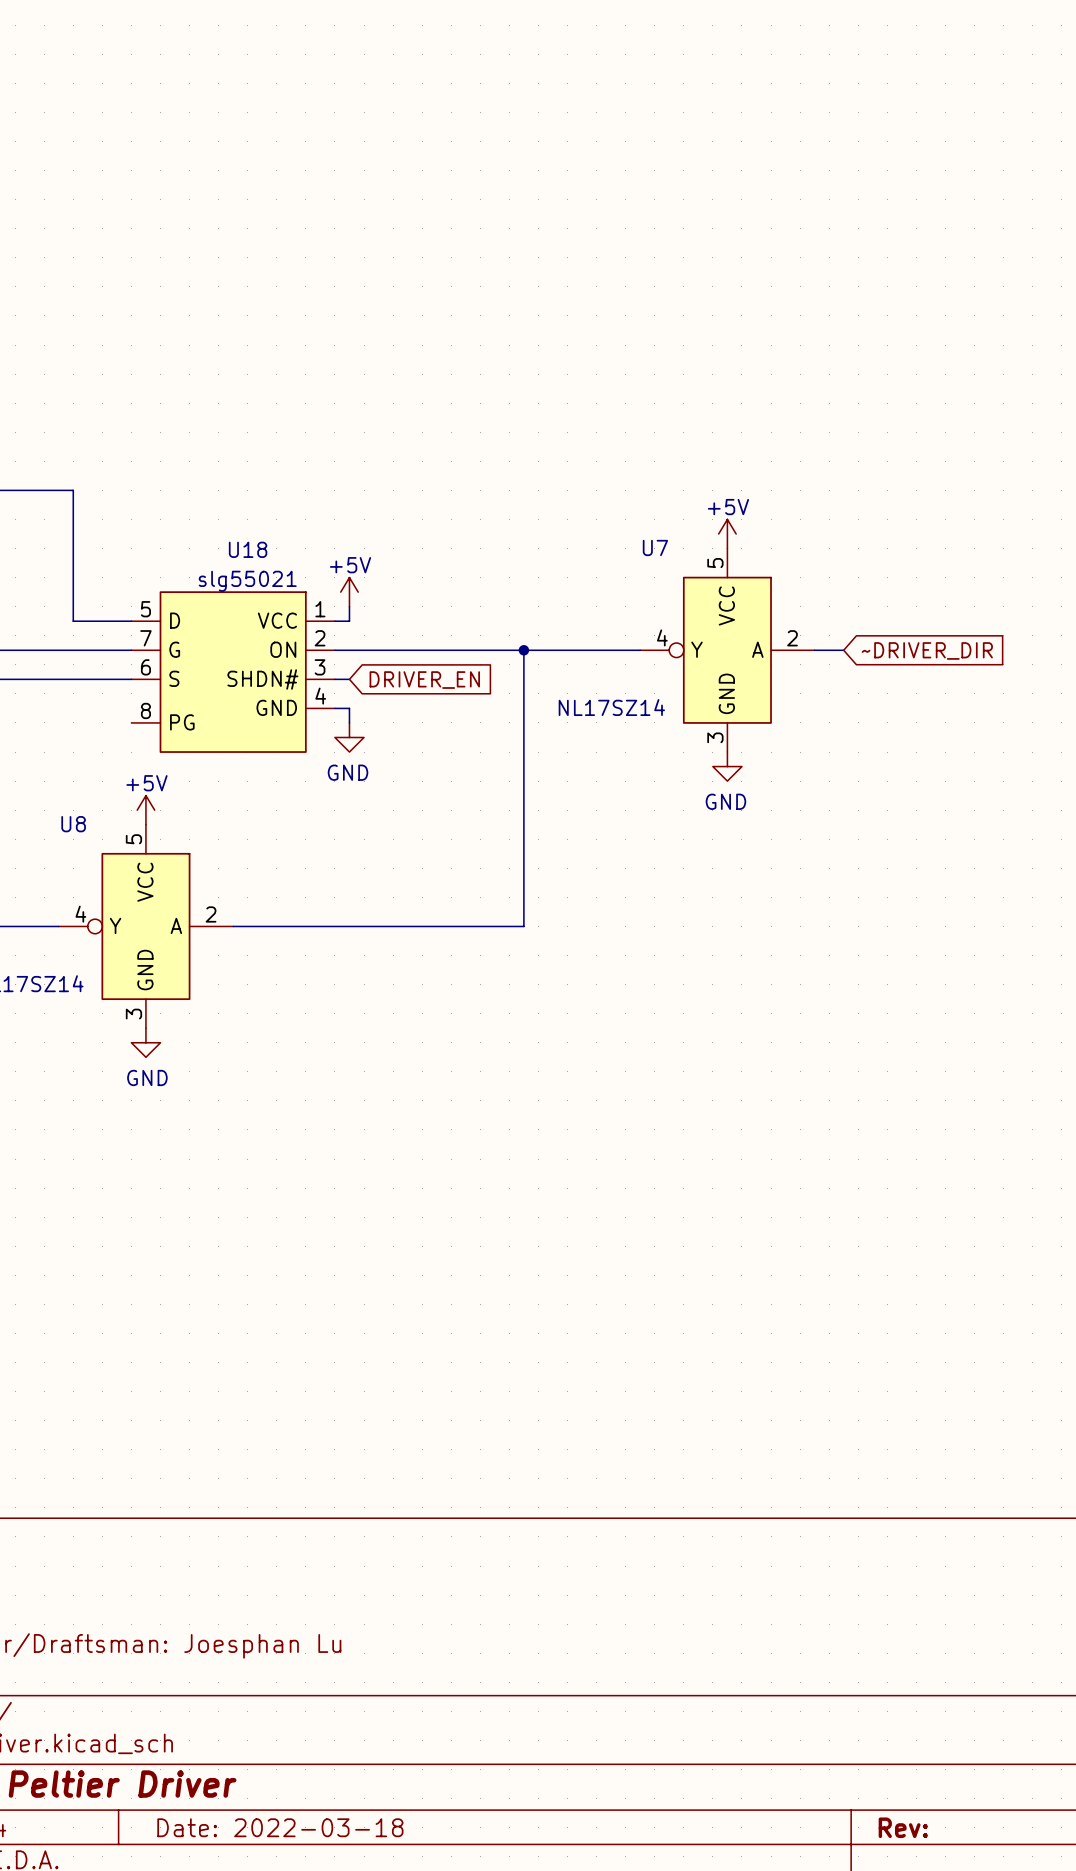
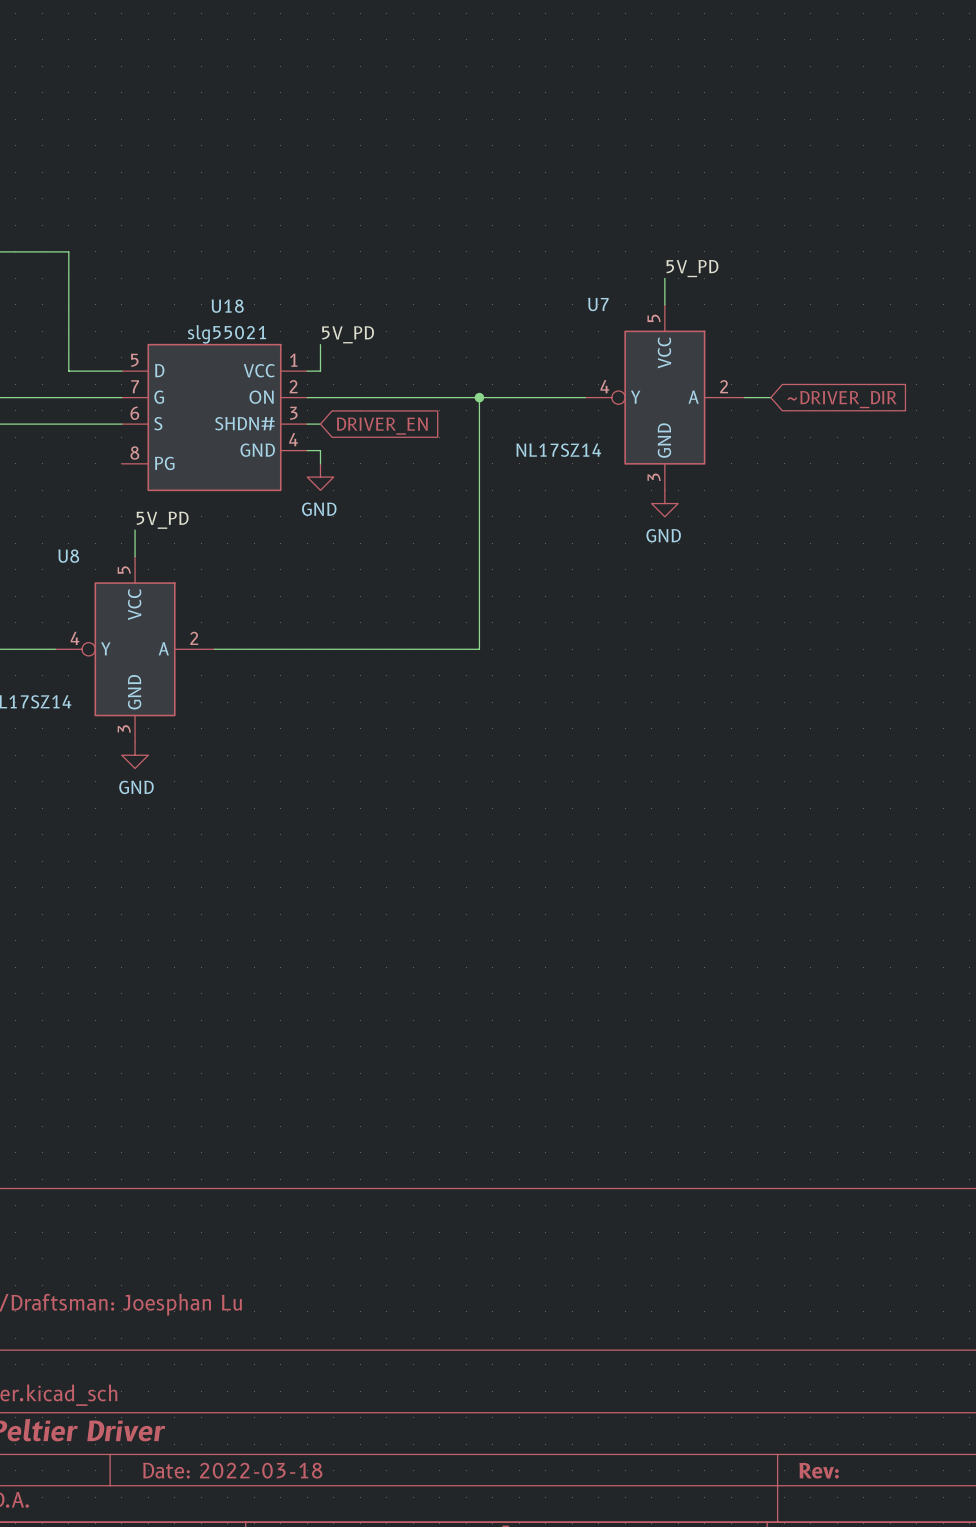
label: none -> 5V_PD (692, 268)
power symbol: +5V (727, 533) -> none
label: none -> 5V_PD (348, 334)
power symbol: +5V (349, 592) -> none
label: none -> 5V_PD (162, 520)
power symbol: +5V (145, 810) -> none

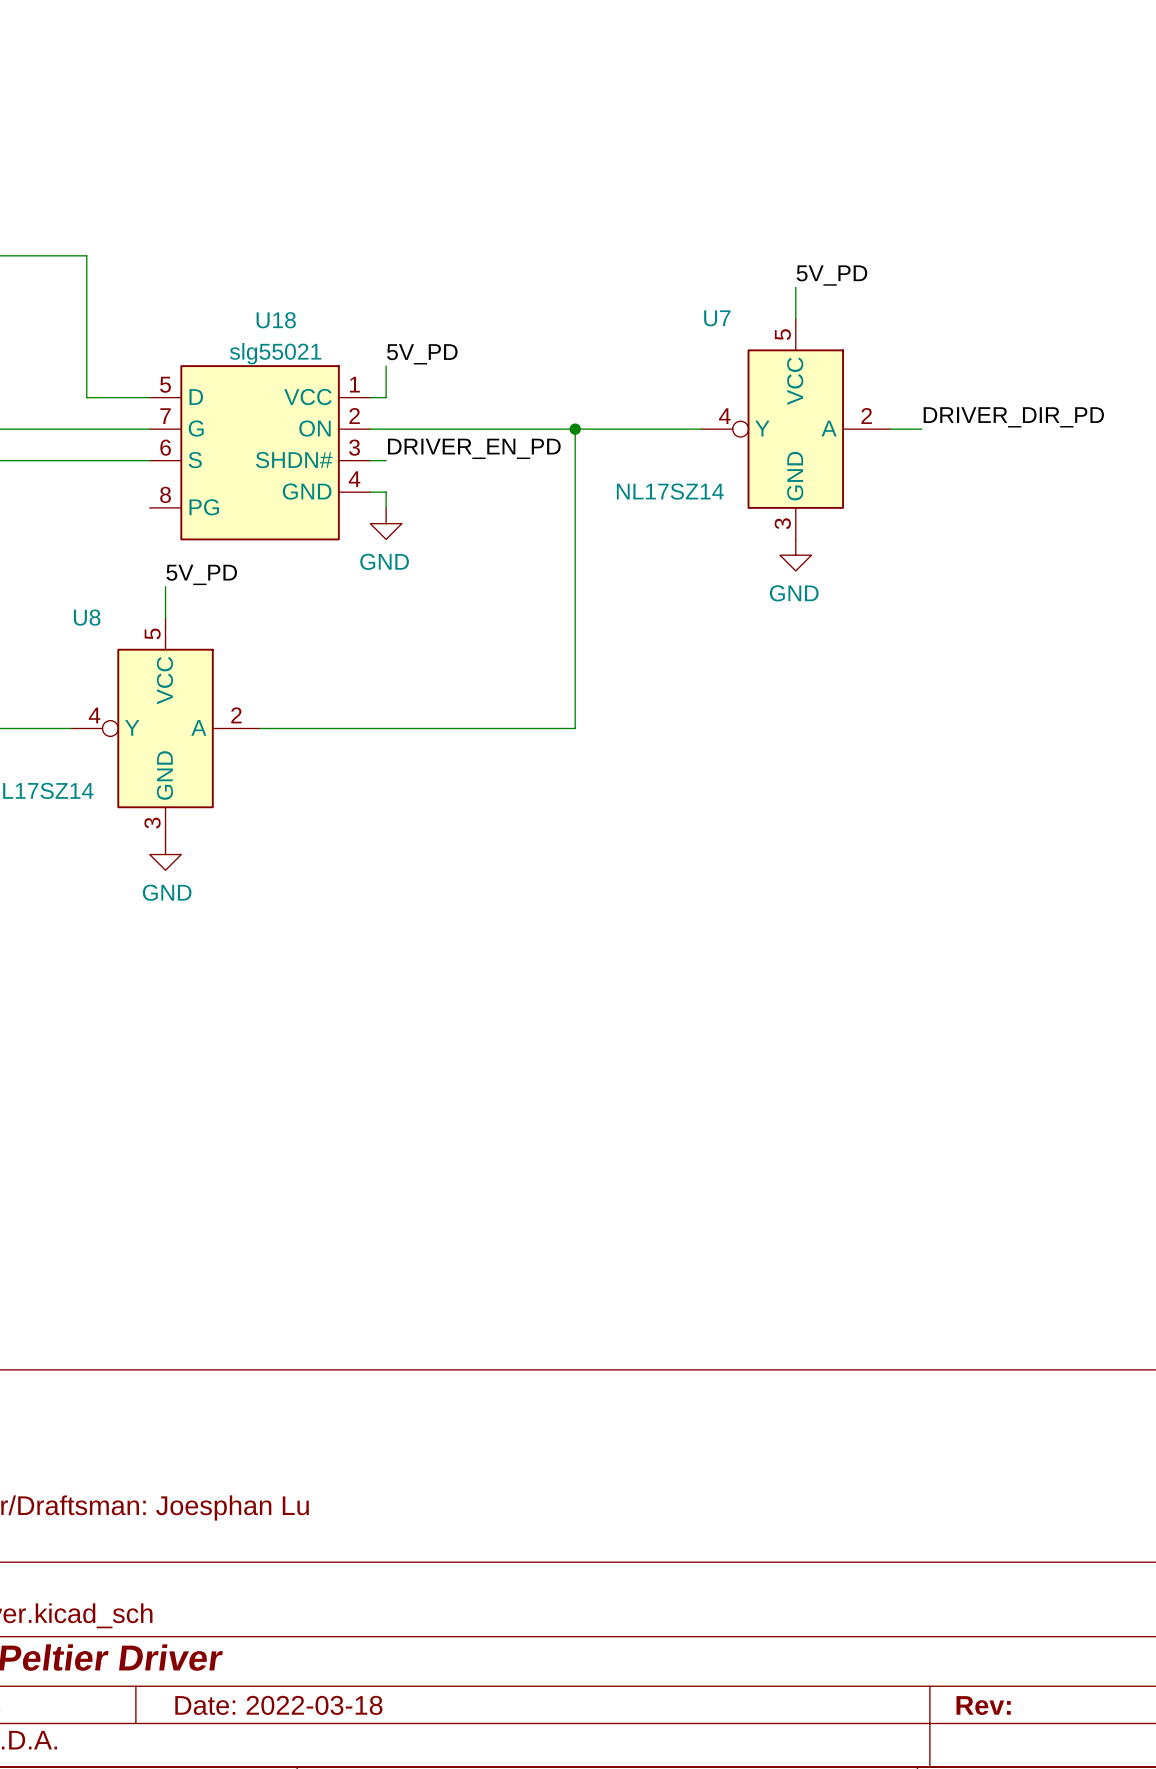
label: none -> DRIVER_DIR_PD (1013, 417)
global label: ~DRIVER_DIR (842, 399) -> none
label: none -> DRIVER_EN_PD (474, 448)
global label: DRIVER_EN (382, 426) -> none

